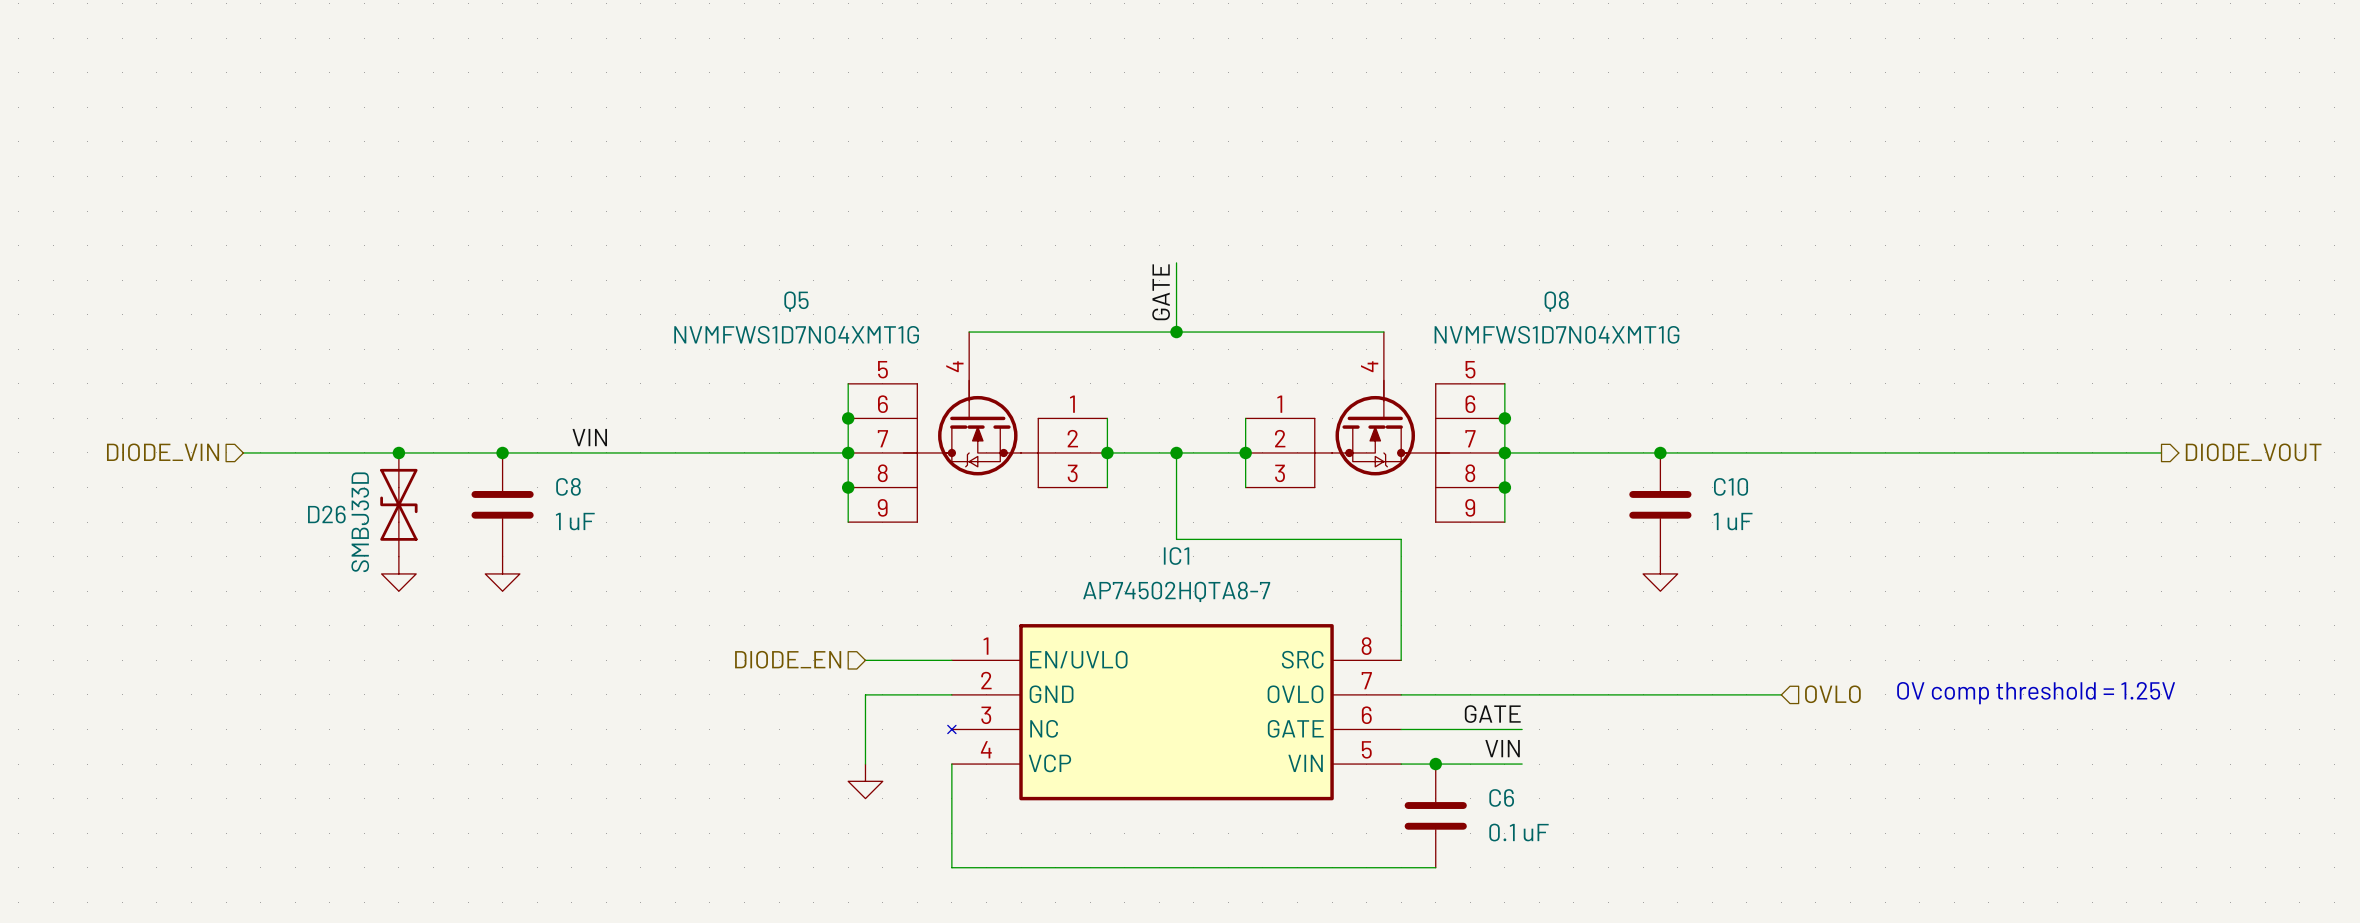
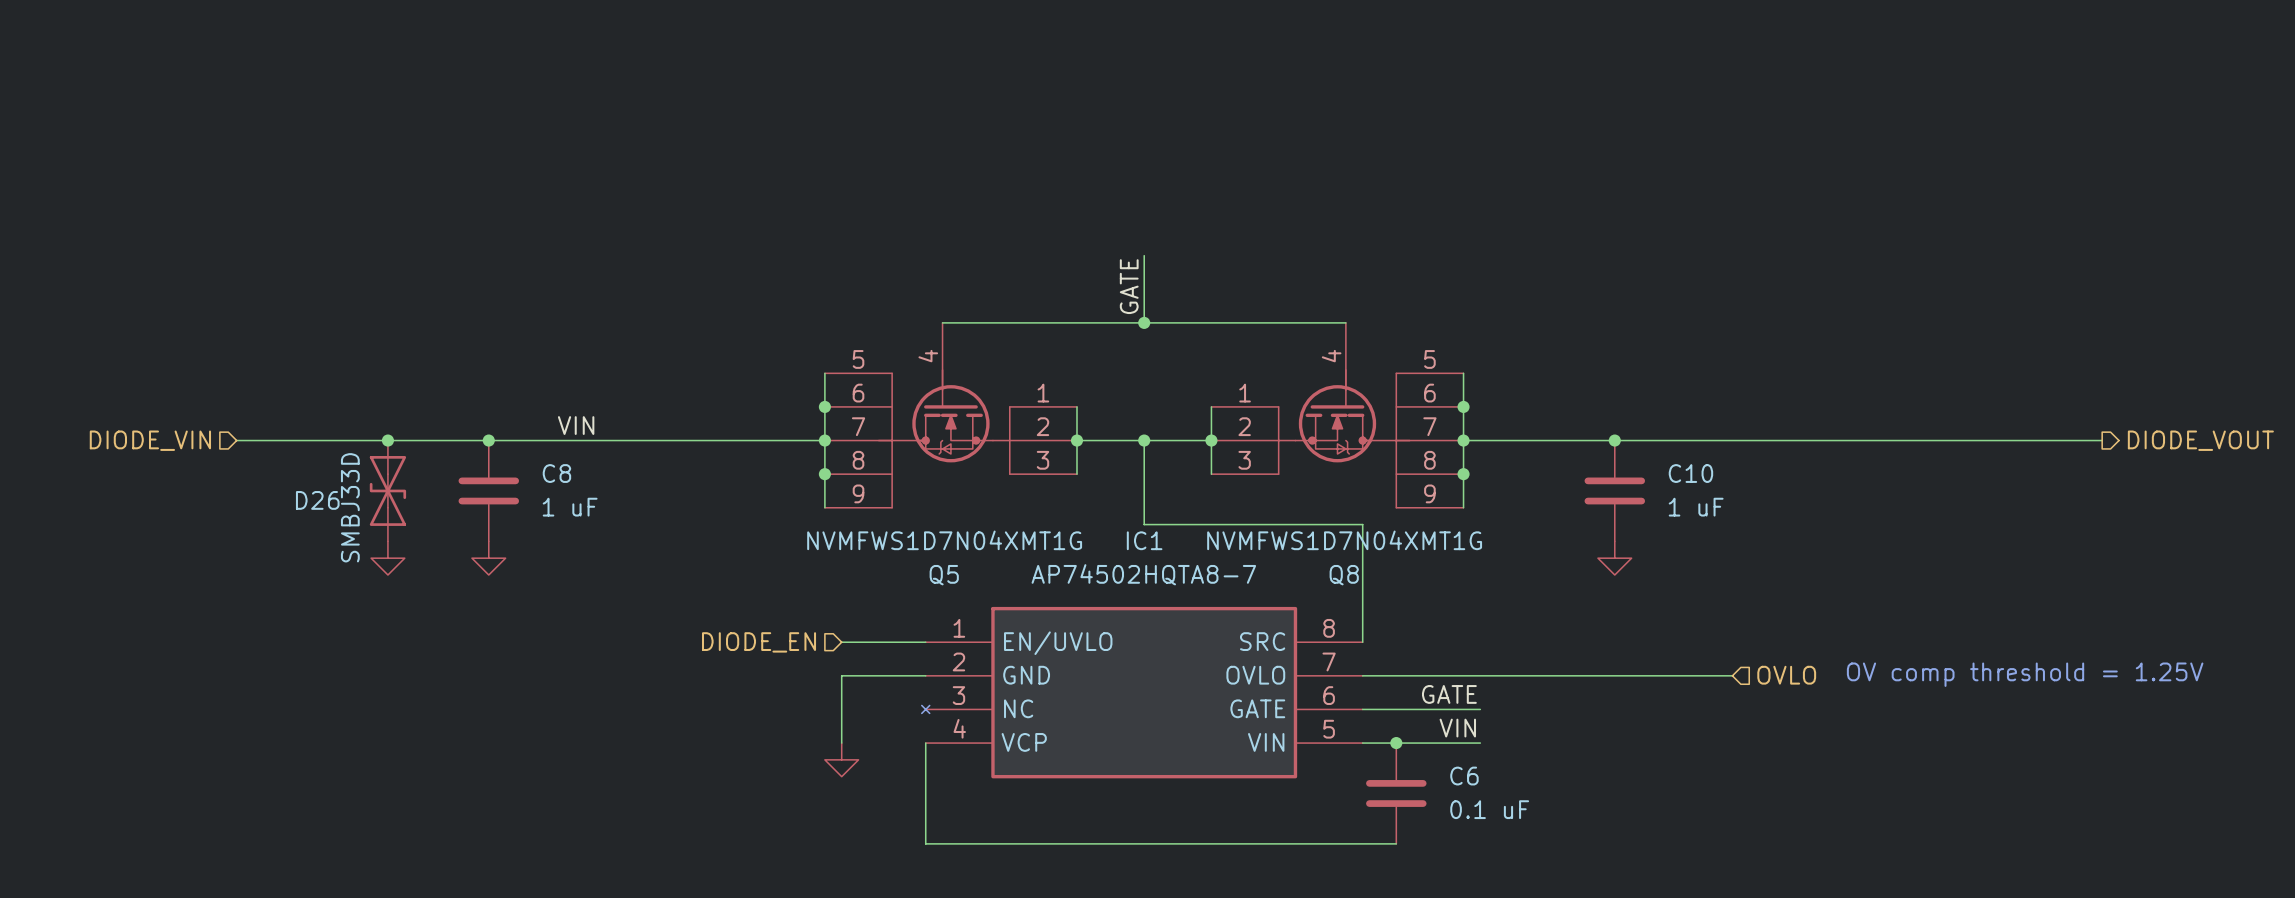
Q5 name position: Q5 (796, 301) -> Q5 (944, 575)
Q8 name position: Q8 (1556, 301) -> Q8 (1344, 575)
Q5 value position: NVMFWS1D7N04XMT1G (796, 334) -> NVMFWS1D7N04XMT1G (944, 540)
Q8 value position: NVMFWS1D7N04XMT1G (1556, 334) -> NVMFWS1D7N04XMT1G (1344, 540)

